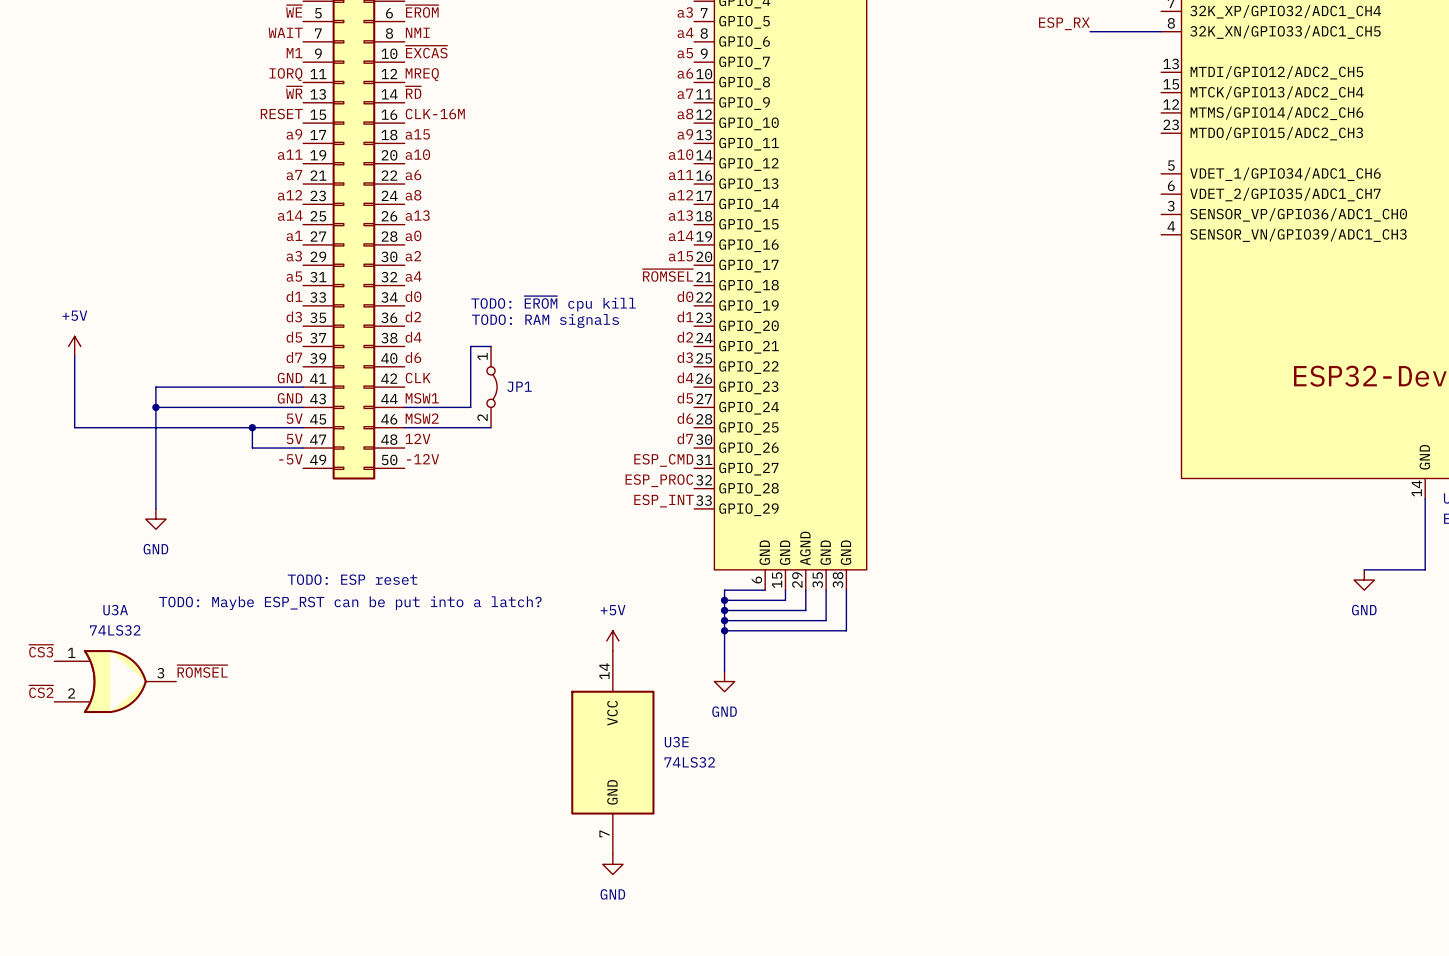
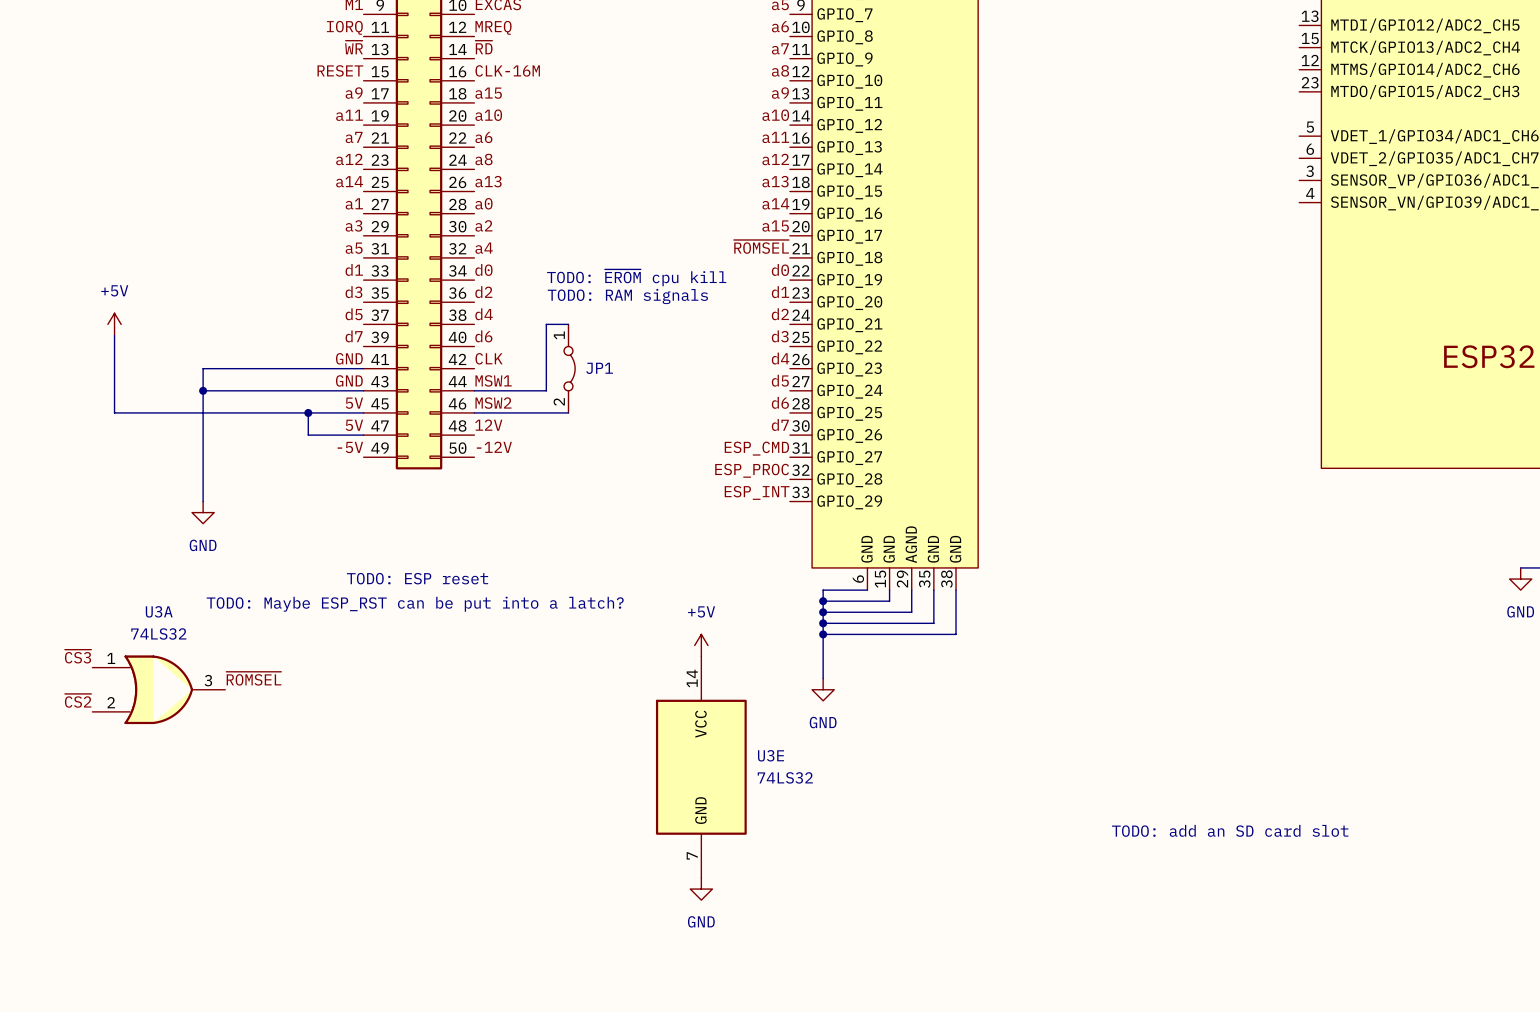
text: none -> TODO: add an SD card slot (1230, 830)

